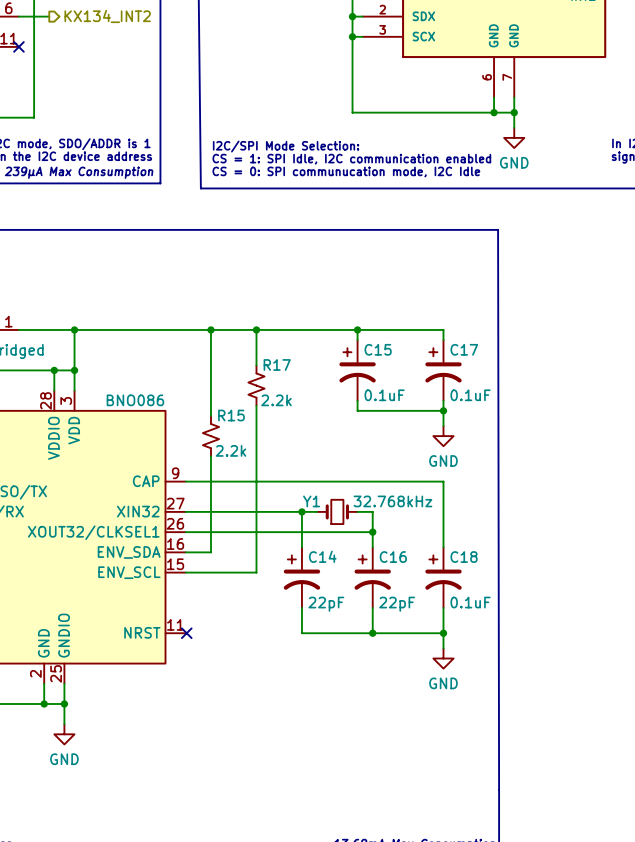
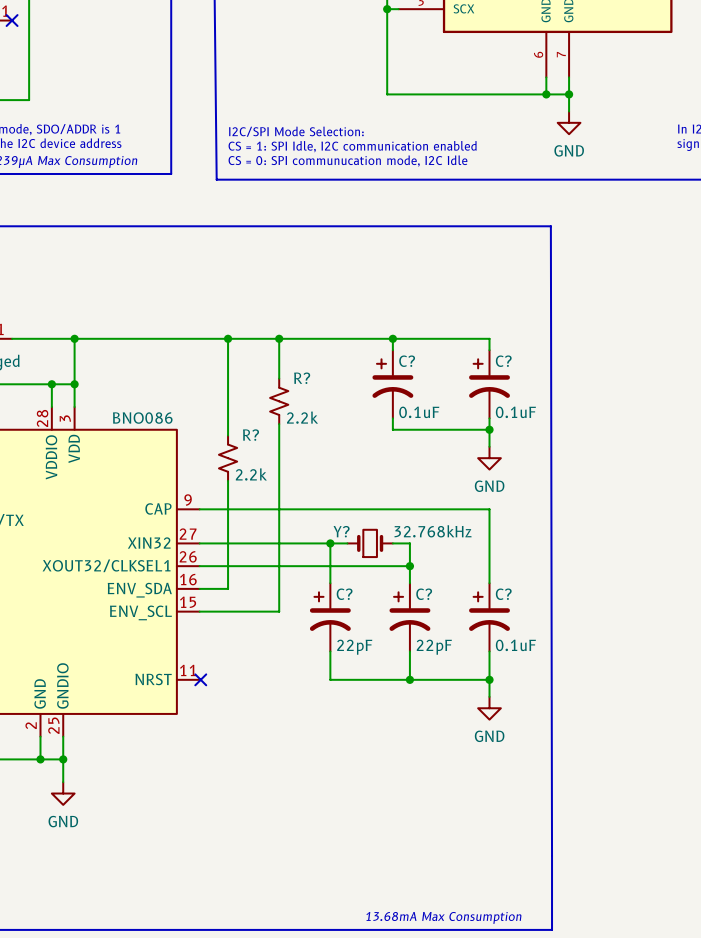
C15 name: C15 (378, 349) -> C? (407, 361)
C17 name: C17 (464, 349) -> C? (503, 361)
R17 name: R17 (277, 364) -> R? (302, 378)
R15 name: R15 (231, 415) -> R? (250, 435)
Y1 name: Y1 (311, 501) -> Y? (341, 531)
C14 name: C14 (322, 556) -> C? (344, 594)
C16 name: C16 (393, 557) -> C? (424, 594)
C18 name: C18 (464, 557) -> C? (503, 594)

